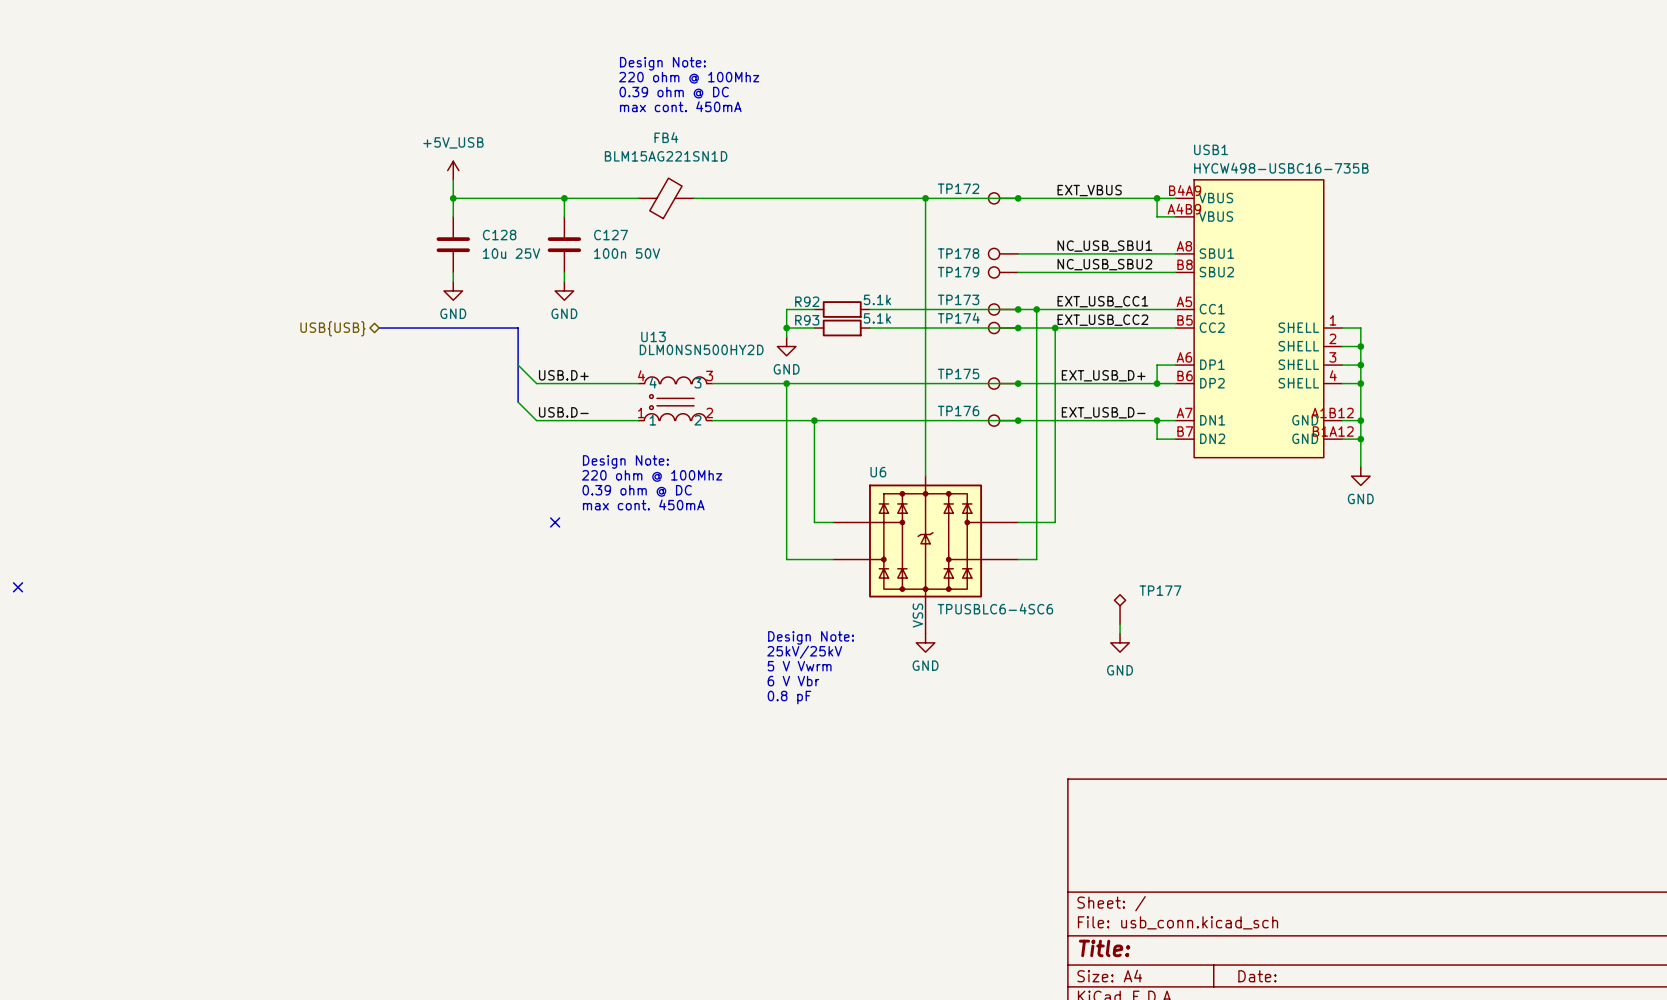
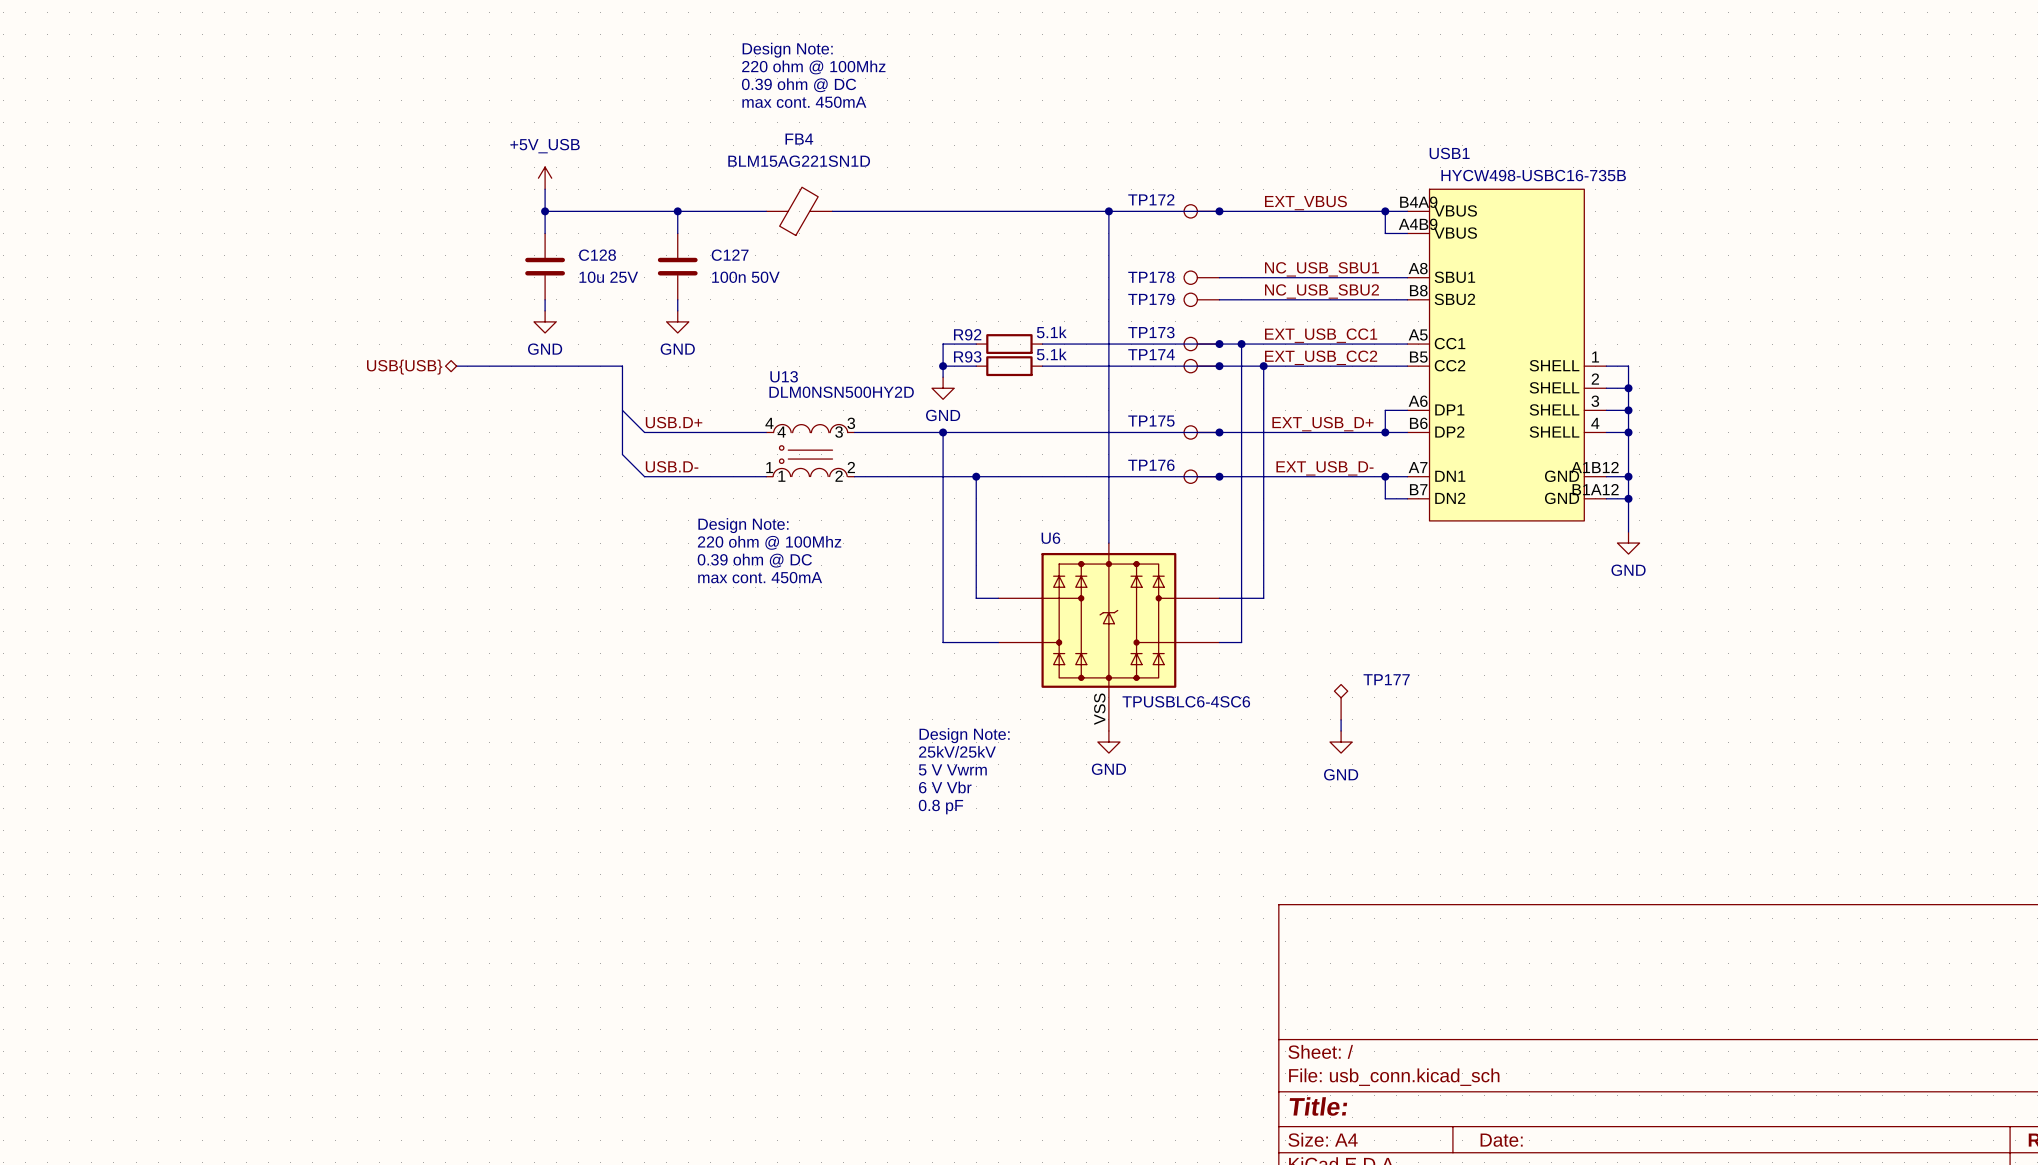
no-connect mark: (555, 522) -> none
no-connect mark: (18, 587) -> none

